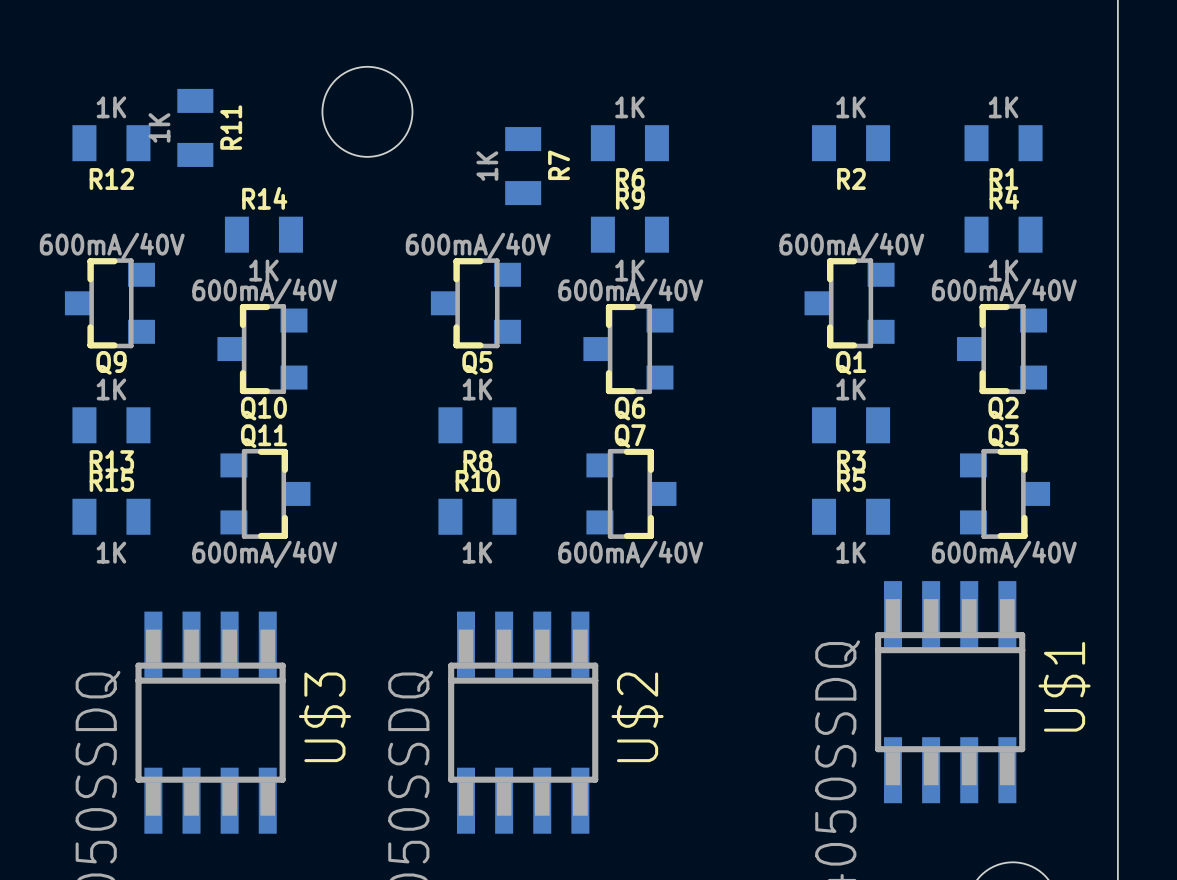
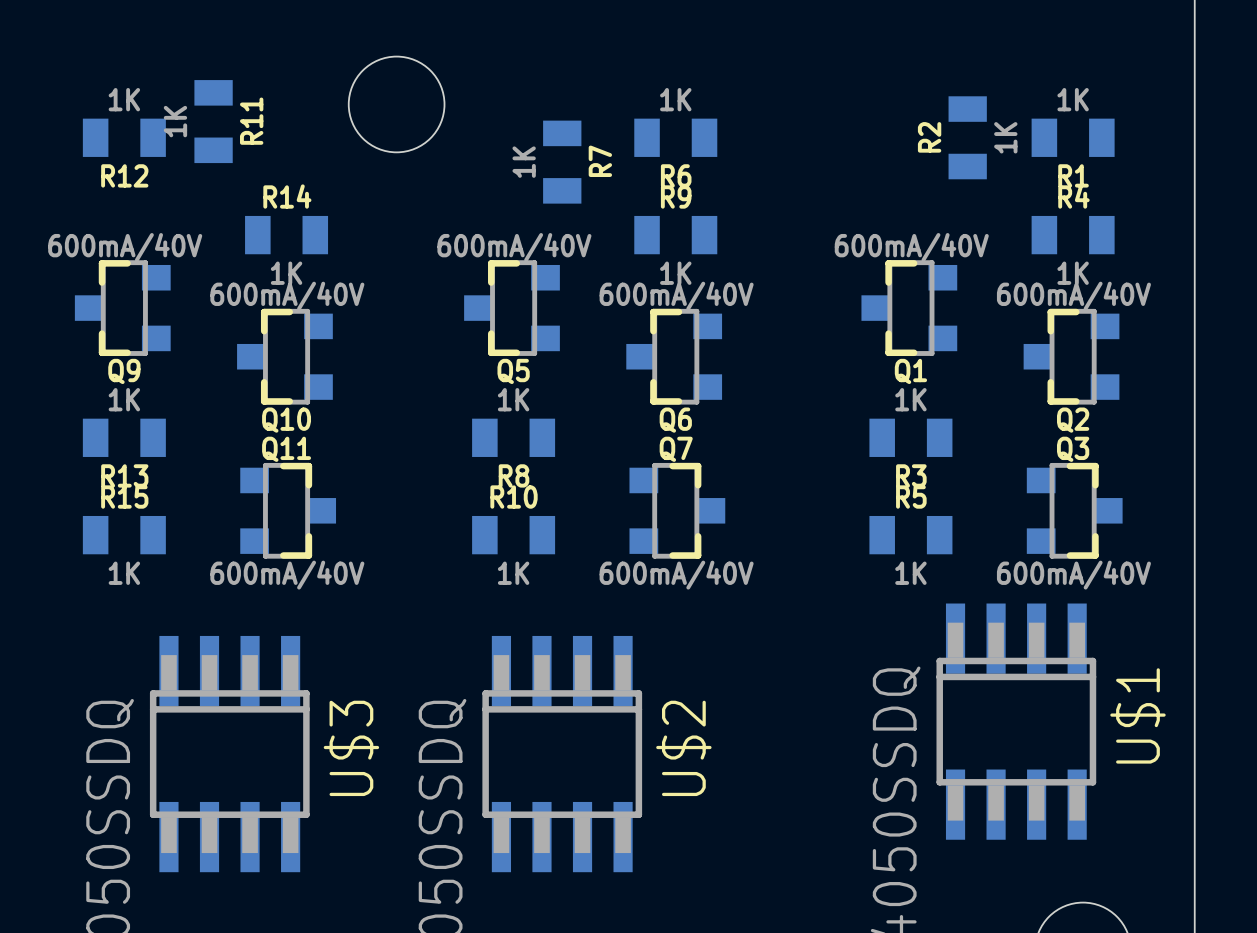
R2 rotation: 0° (851, 143) -> 90° clockwise (967, 137)
R2 position: (851, 143) -> (967, 137)

